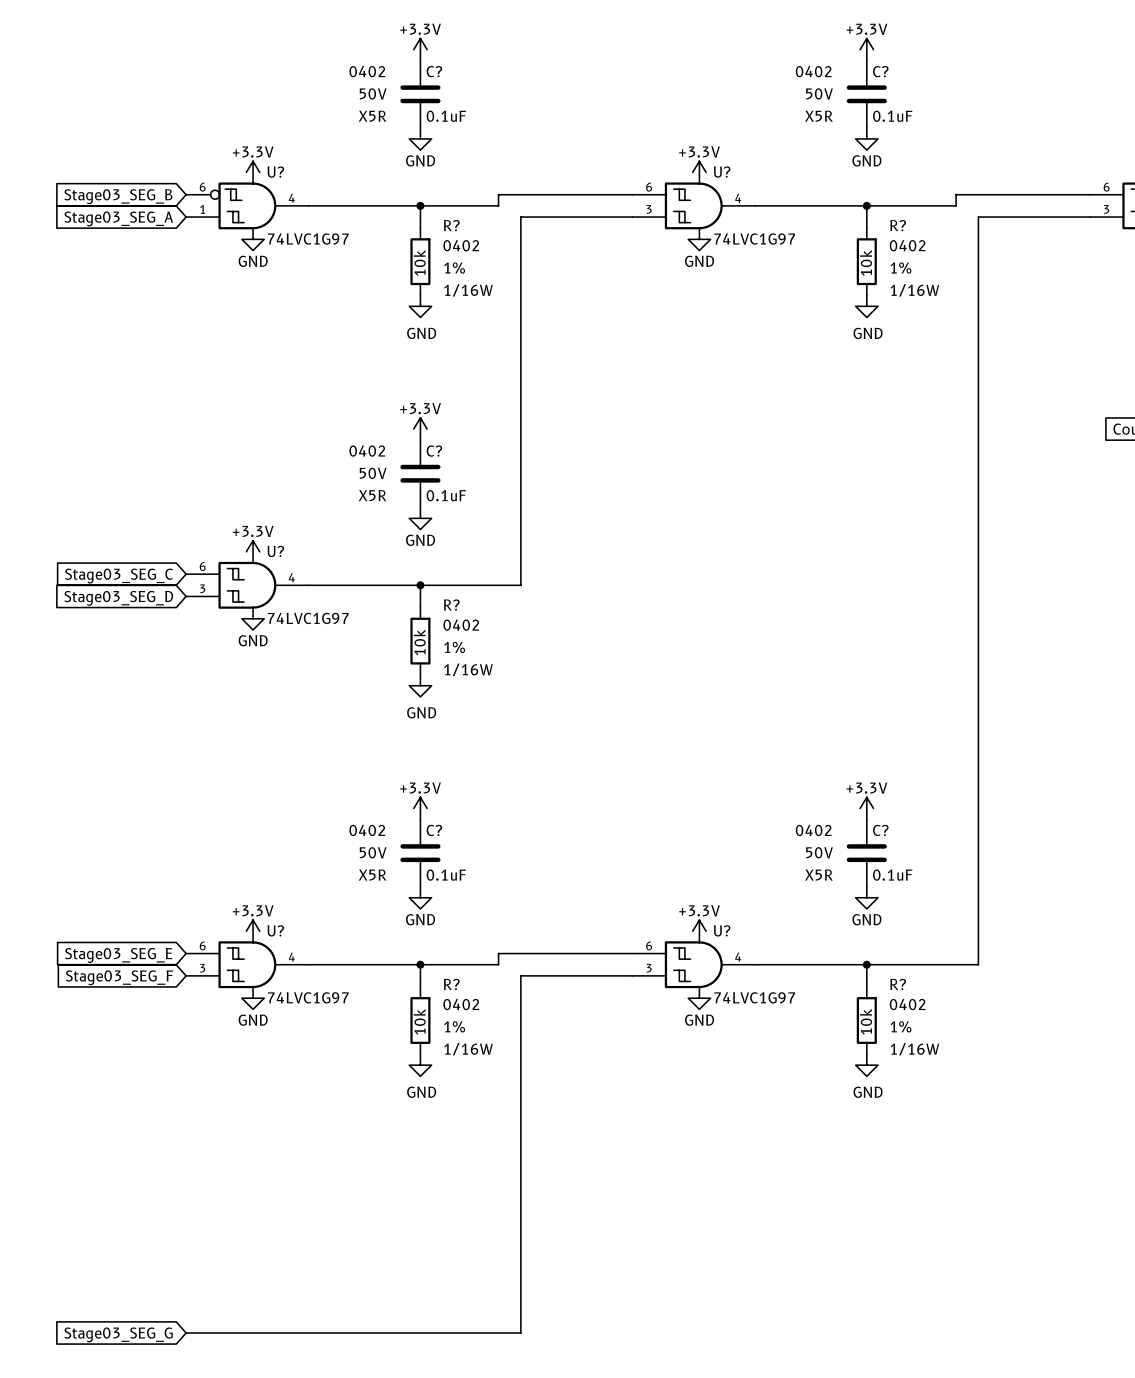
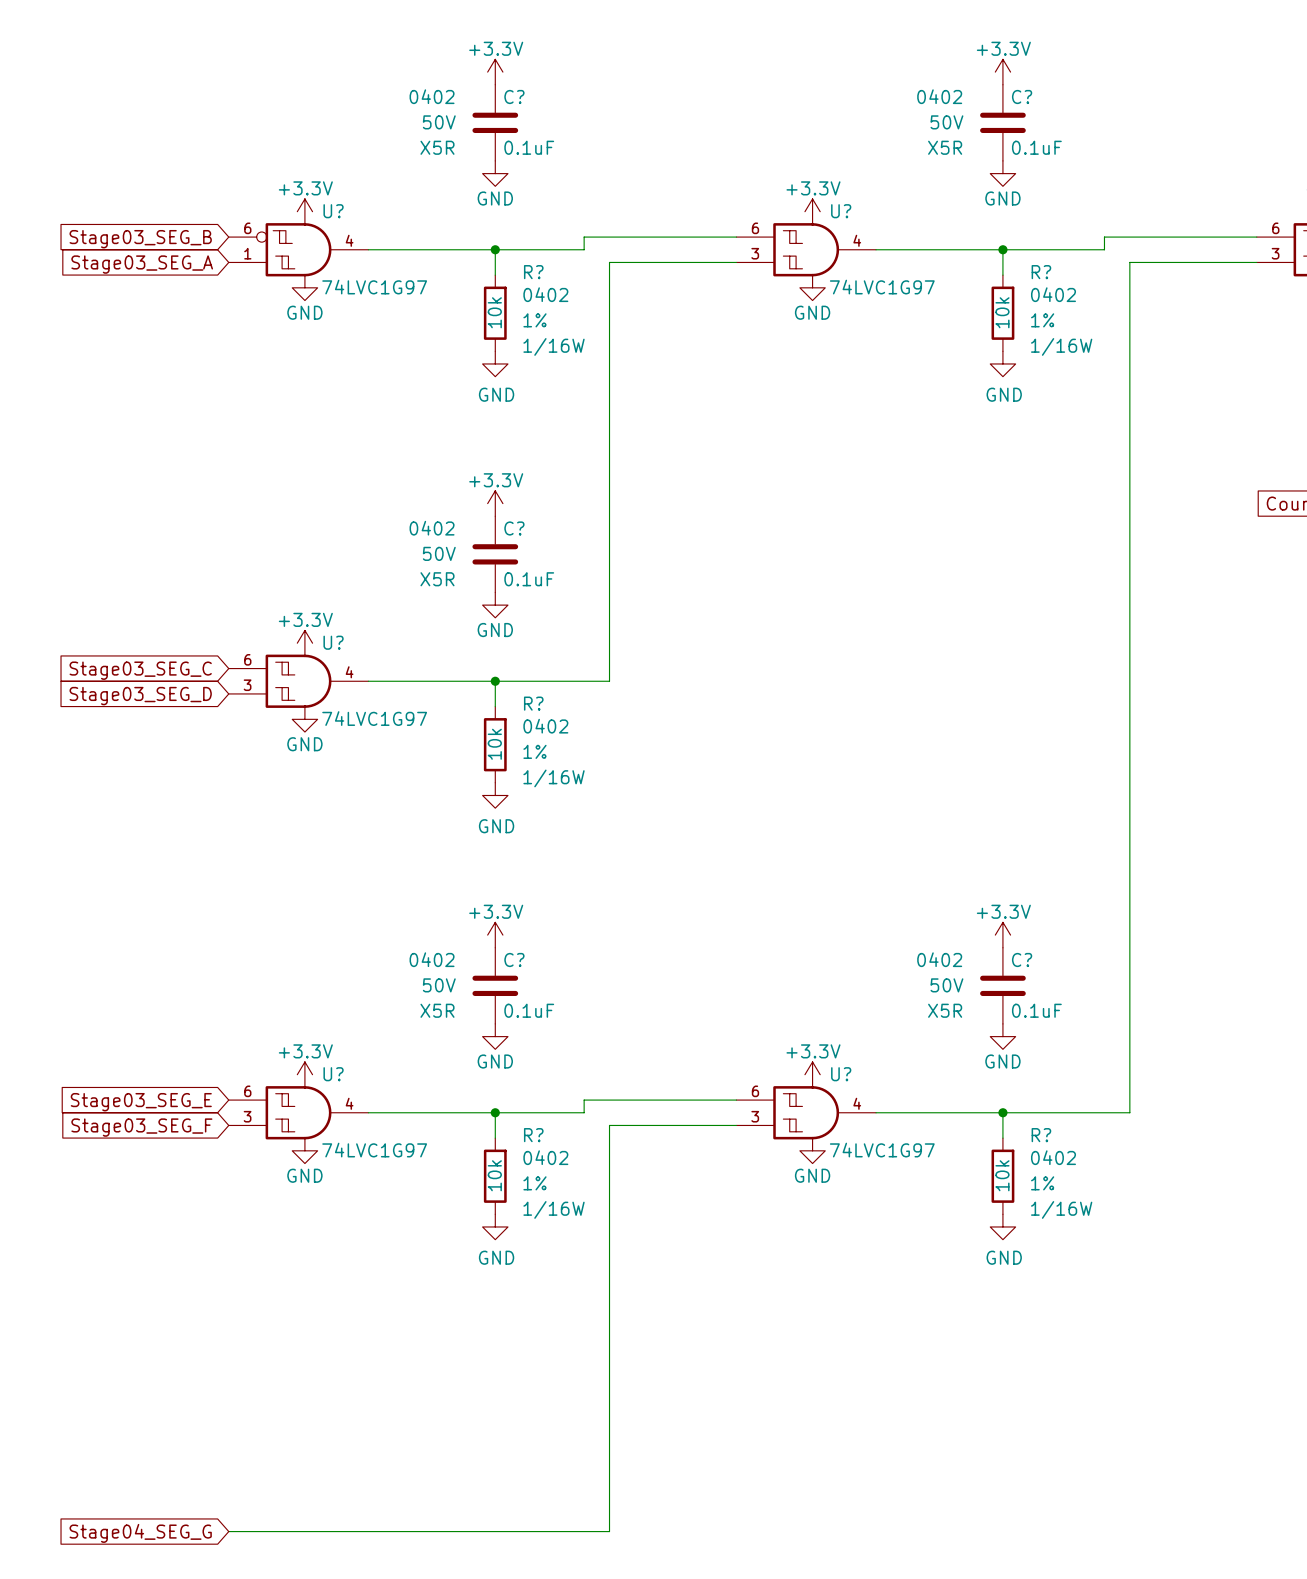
global label: Stage03_SEG_G (118, 1334) -> Stage04_SEG_G (140, 1533)

